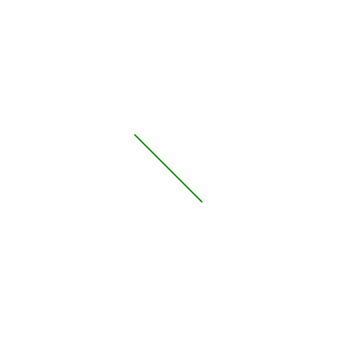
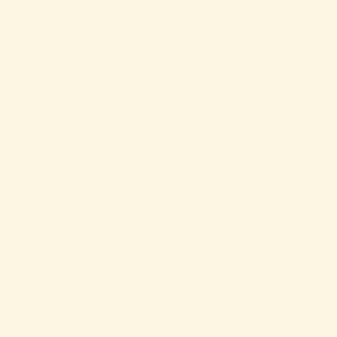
wire: (134, 134) (201, 201) -> none

